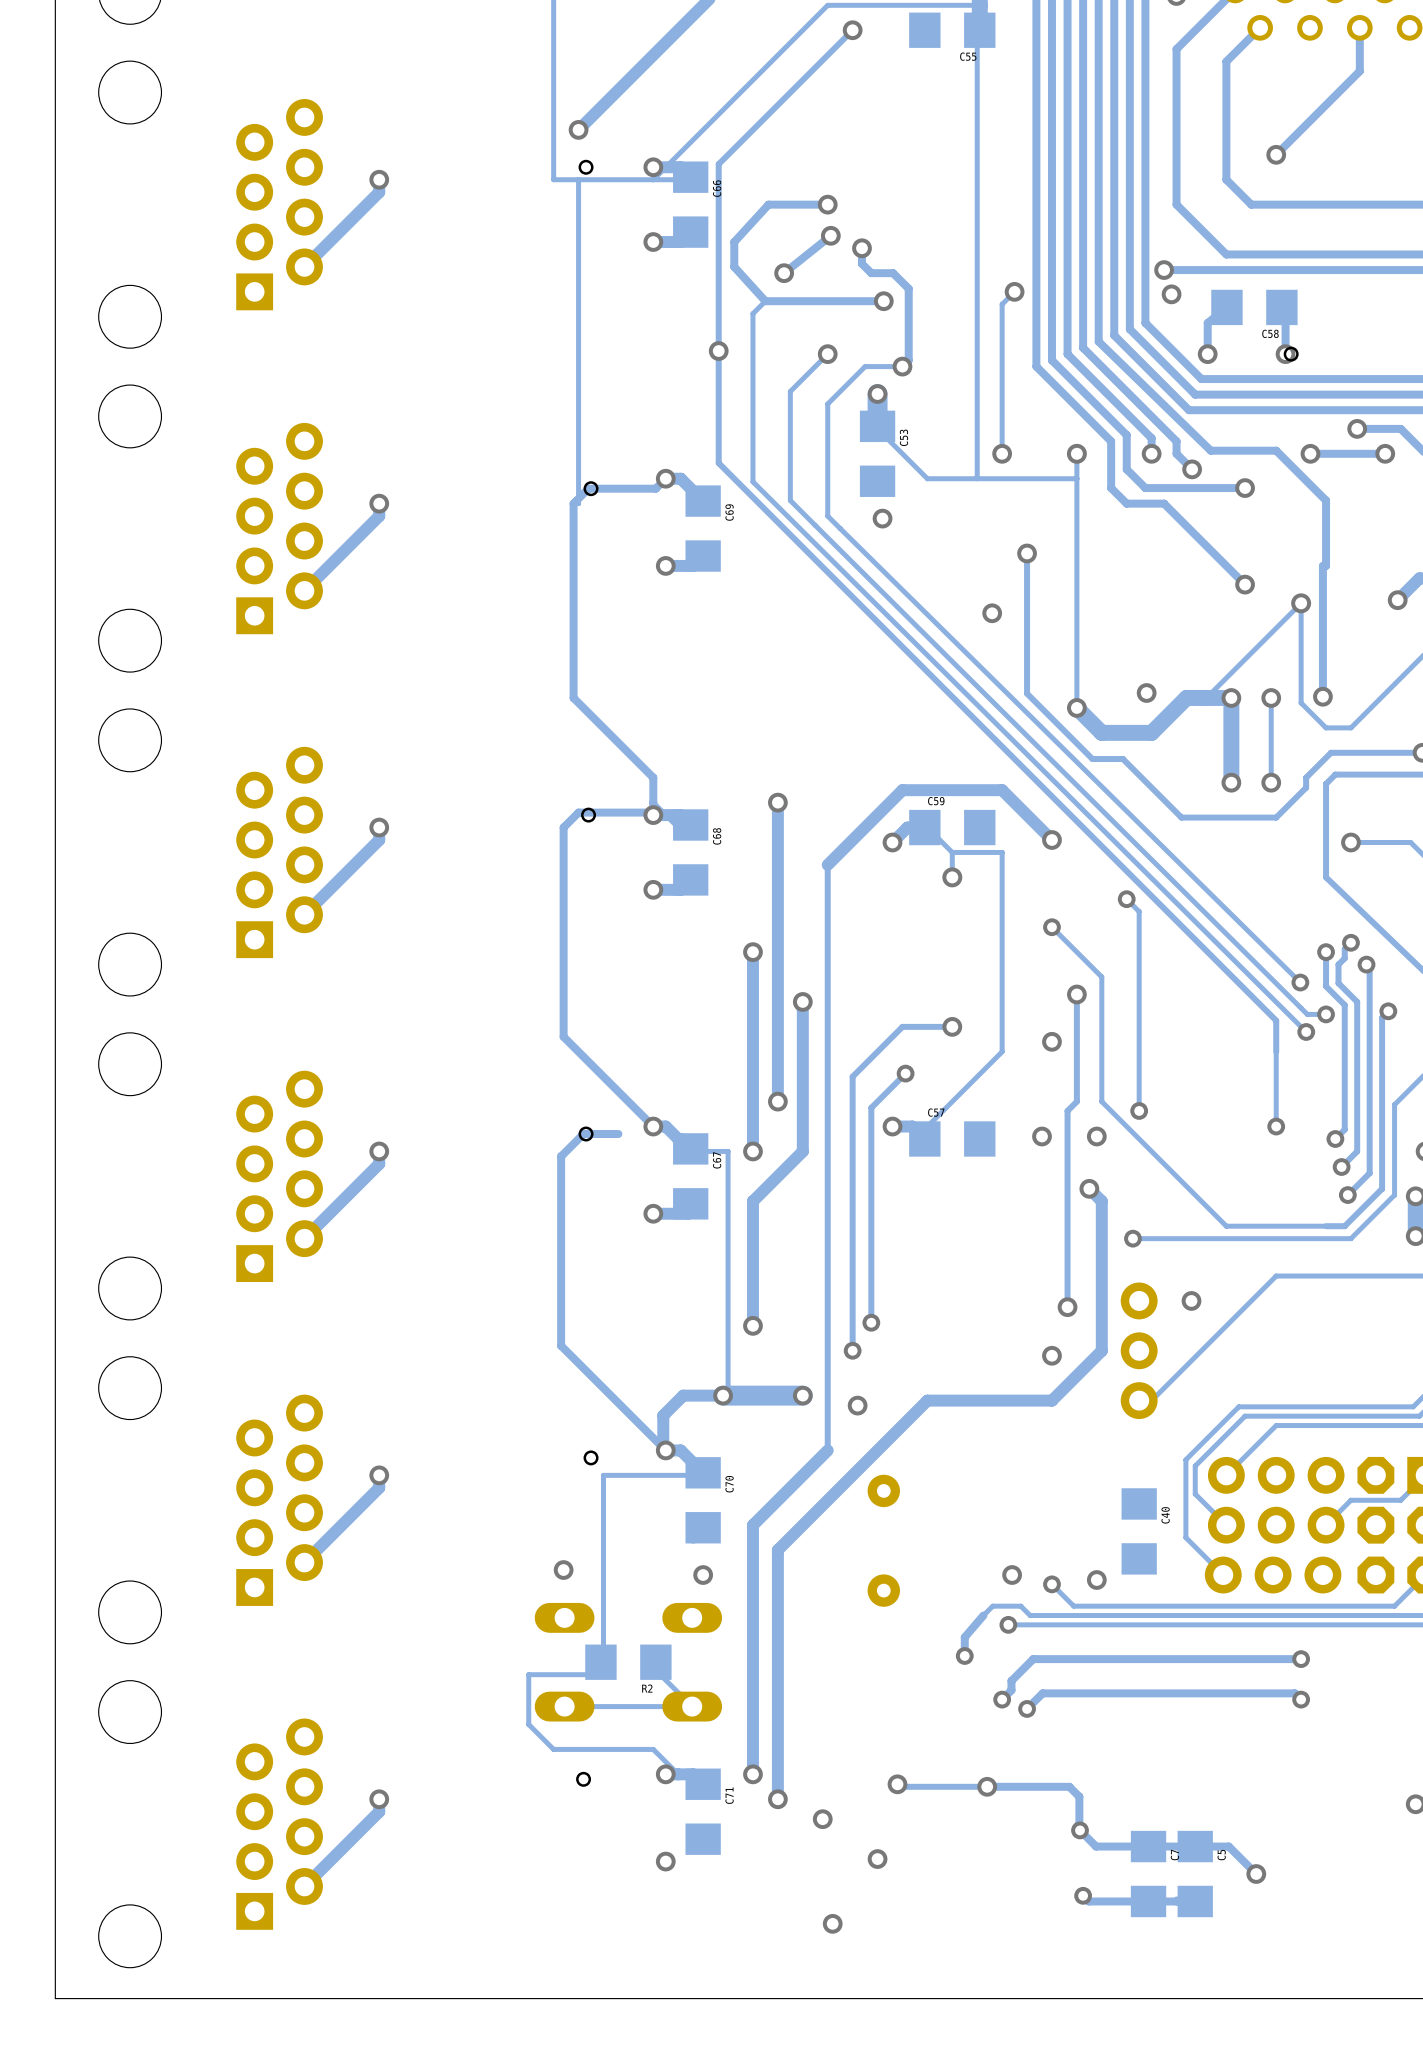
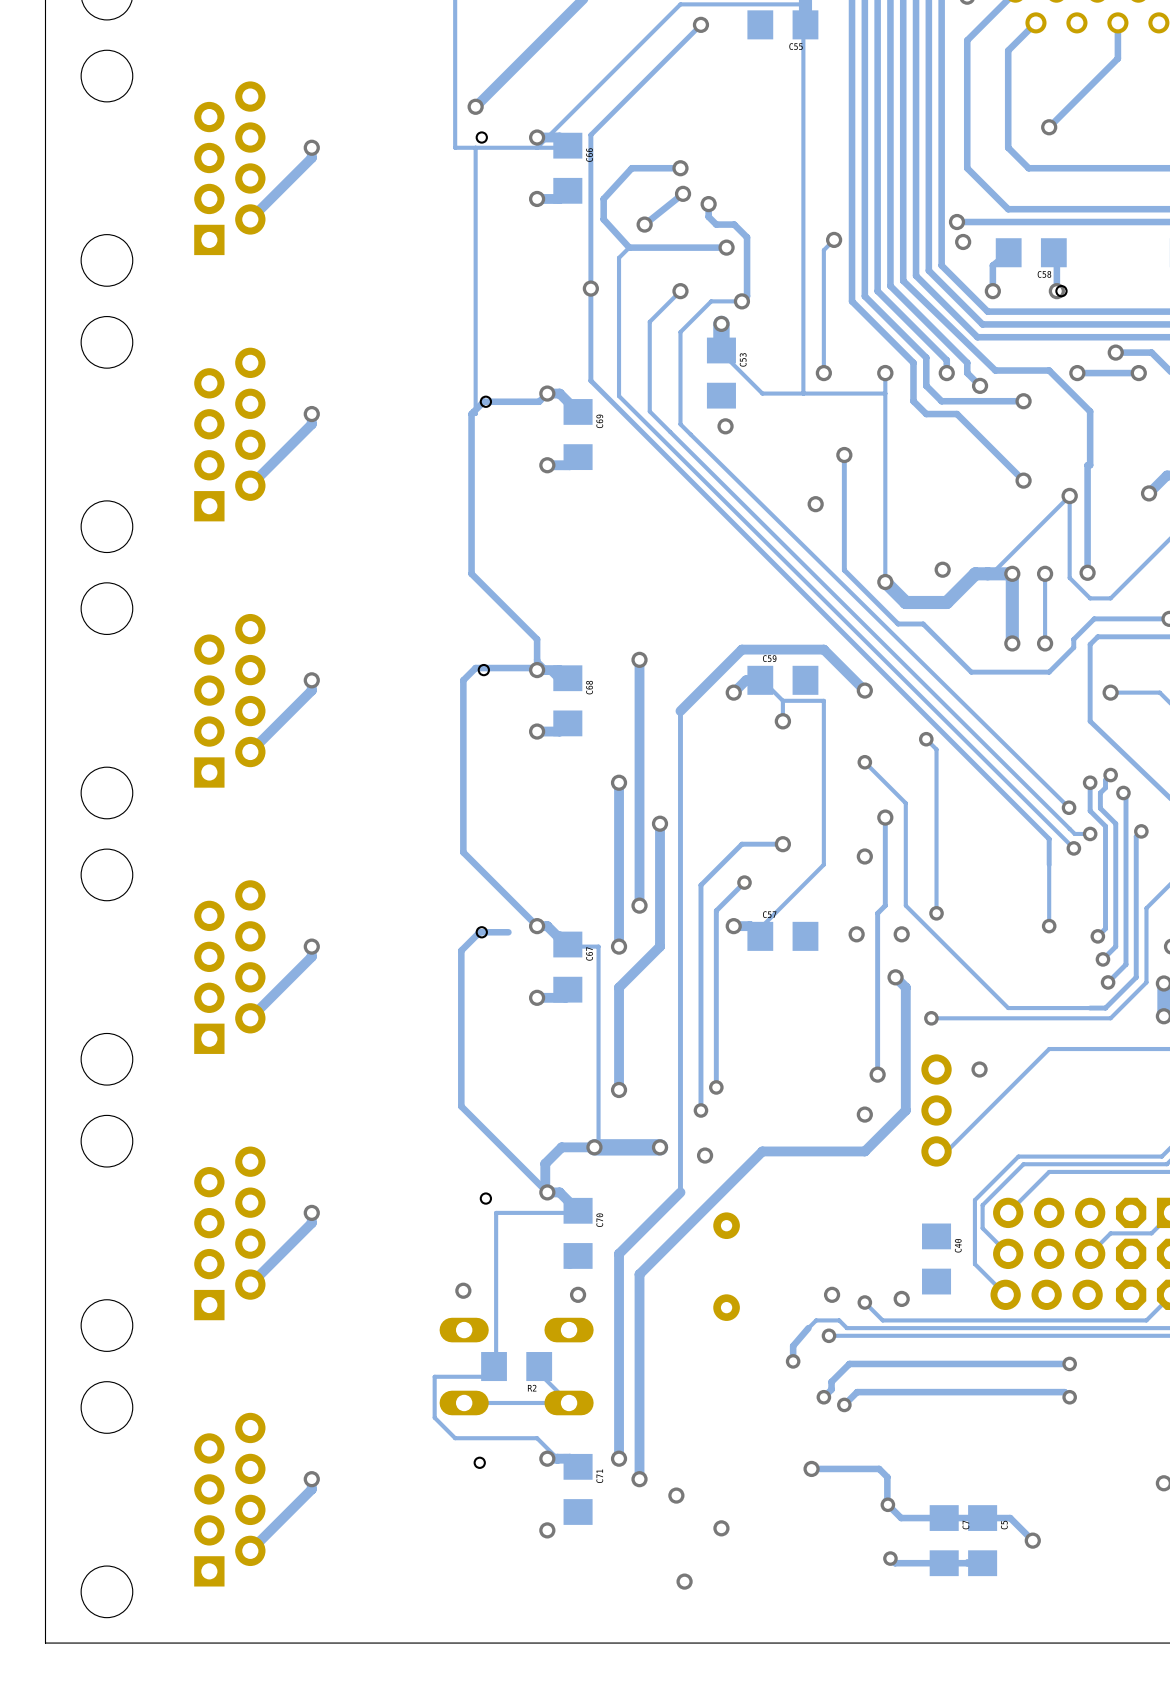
track: (897, 1784) (899, 1786) (984, 1786) -> none
via: (897, 1784) -> none

